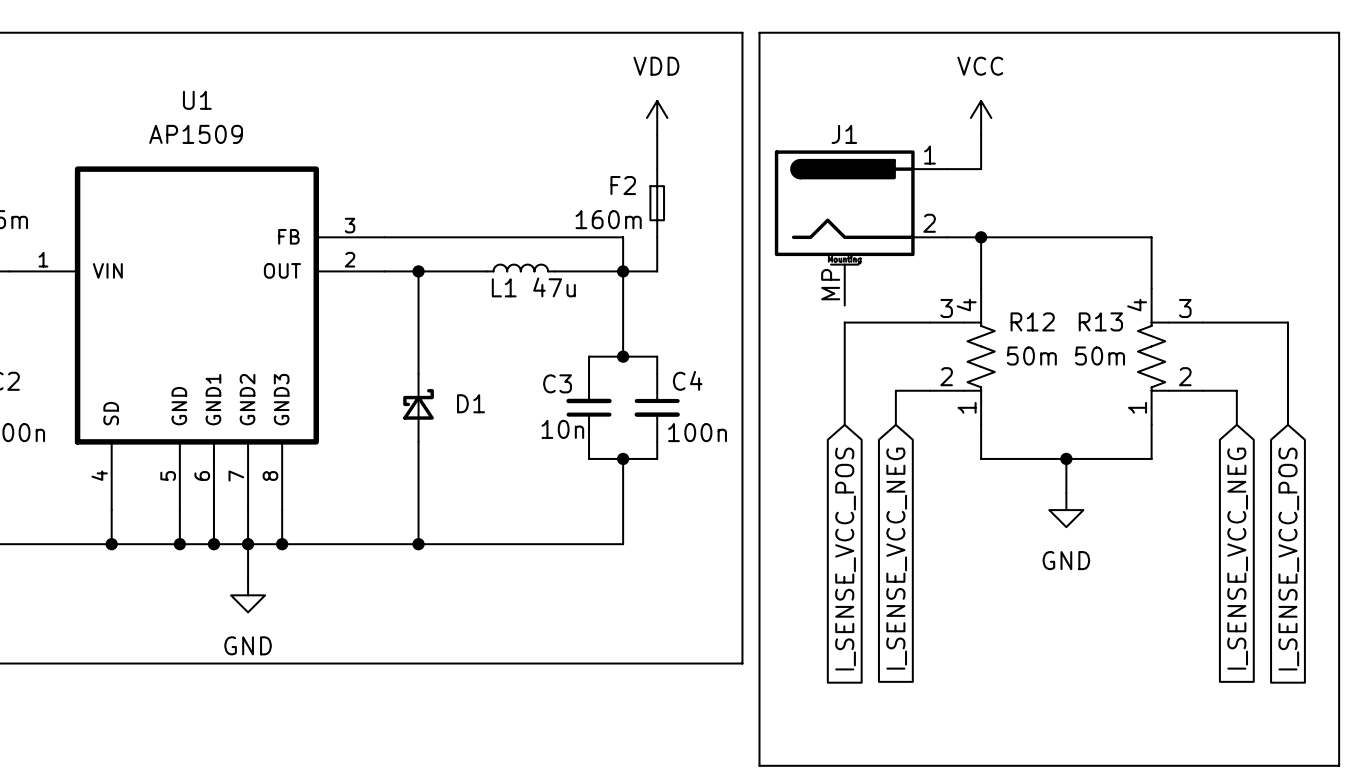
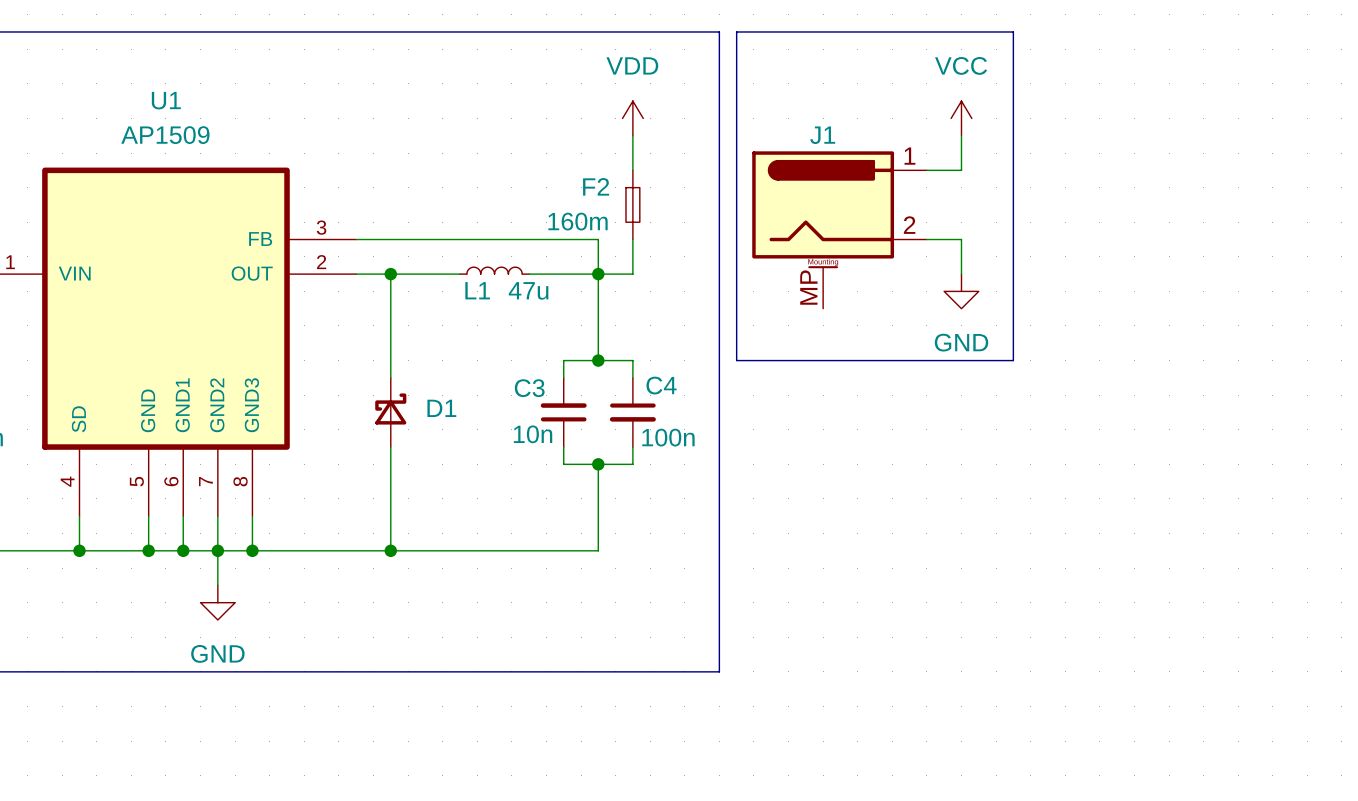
line: (1032, 32) (1339, 32) (1339, 765) (759, 765) (759, 356) -> (1013, 31) (1013, 360) (736, 360)
wire: (981, 237) (1151, 237) (1151, 288) -> none
junction: (981, 237) -> none
wire: (929, 322) (844, 322) (844, 424) -> none
wire: (1202, 322) (1287, 322) (1287, 424) -> none
R12: 50m (962, 356) -> none
R13: 50m (1170, 356) -> none
wire: (929, 390) (895, 390) (895, 424) -> none
wire: (1202, 390) (1236, 390) (1236, 424) -> none
wire: (981, 424) (981, 458) (1151, 458) (1151, 424) -> none
wire: (1066, 458) (1066, 493) -> none
junction: (1066, 458) -> none
power symbol position: GND (1066, 510) -> GND (961, 291)
global label: I_SENSE_VCC_NEG (896, 558) -> none
global label: I_SENSE_VCC_NEG (1237, 558) -> none
global label: I_SENSE_VCC_POS (845, 559) -> none
global label: I_SENSE_VCC_POS (1288, 559) -> none

